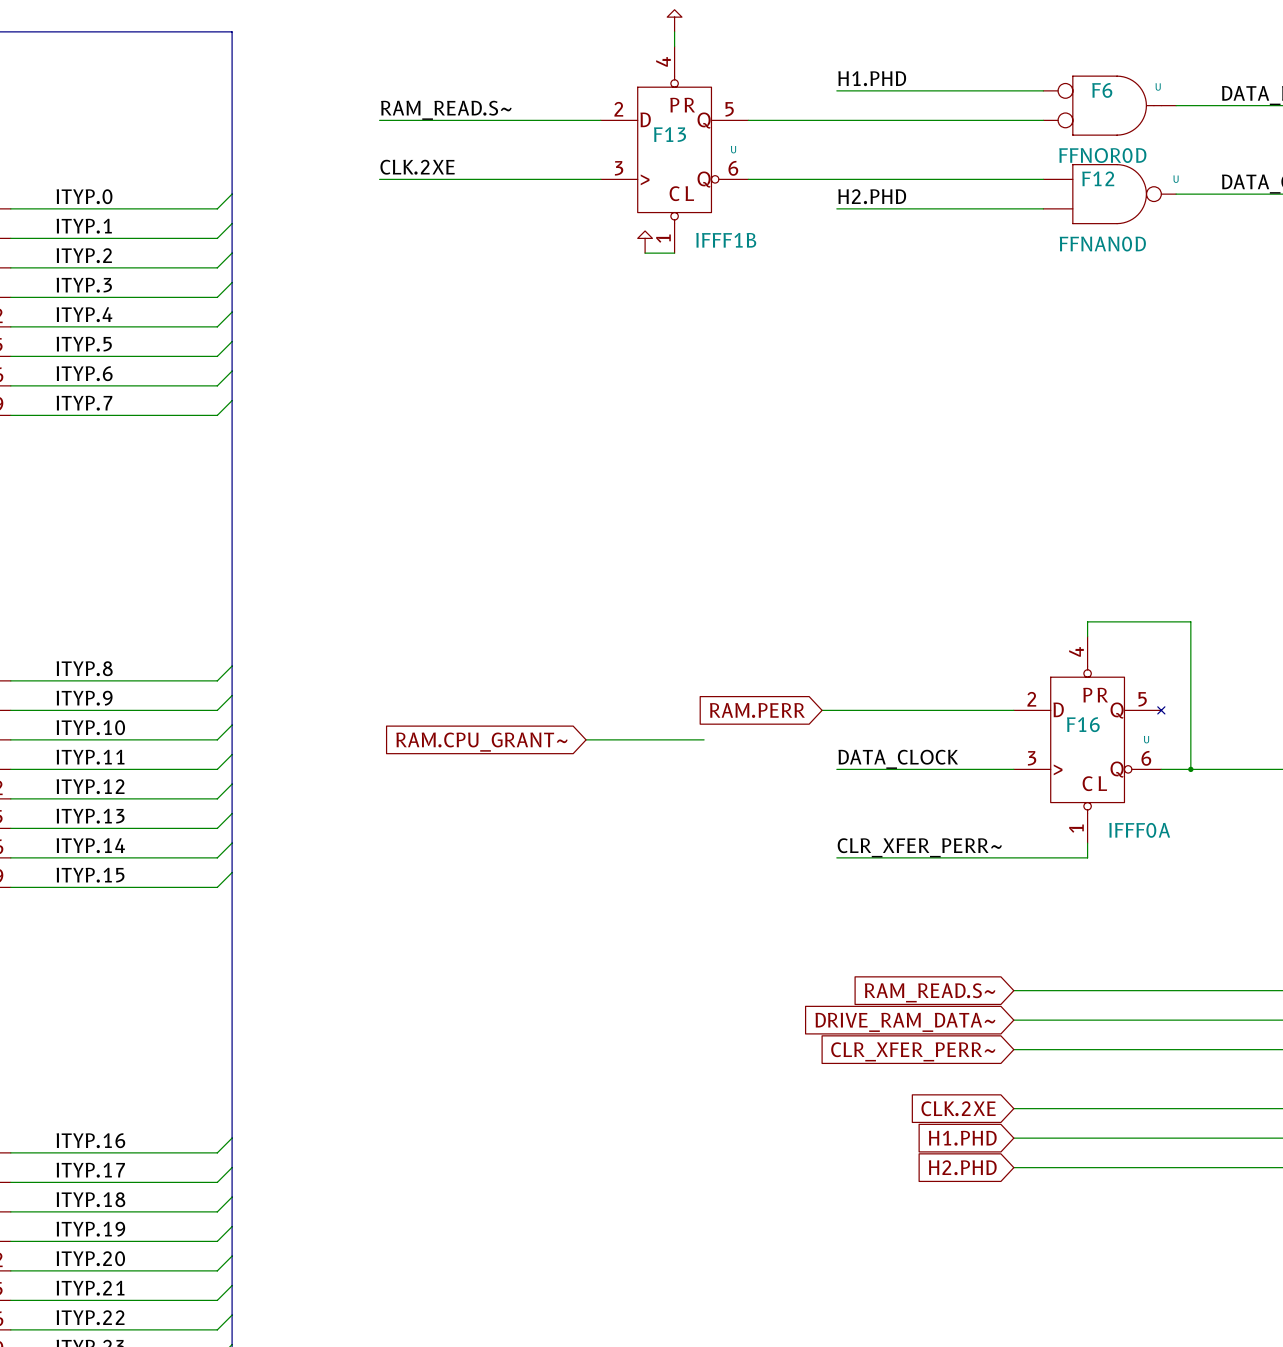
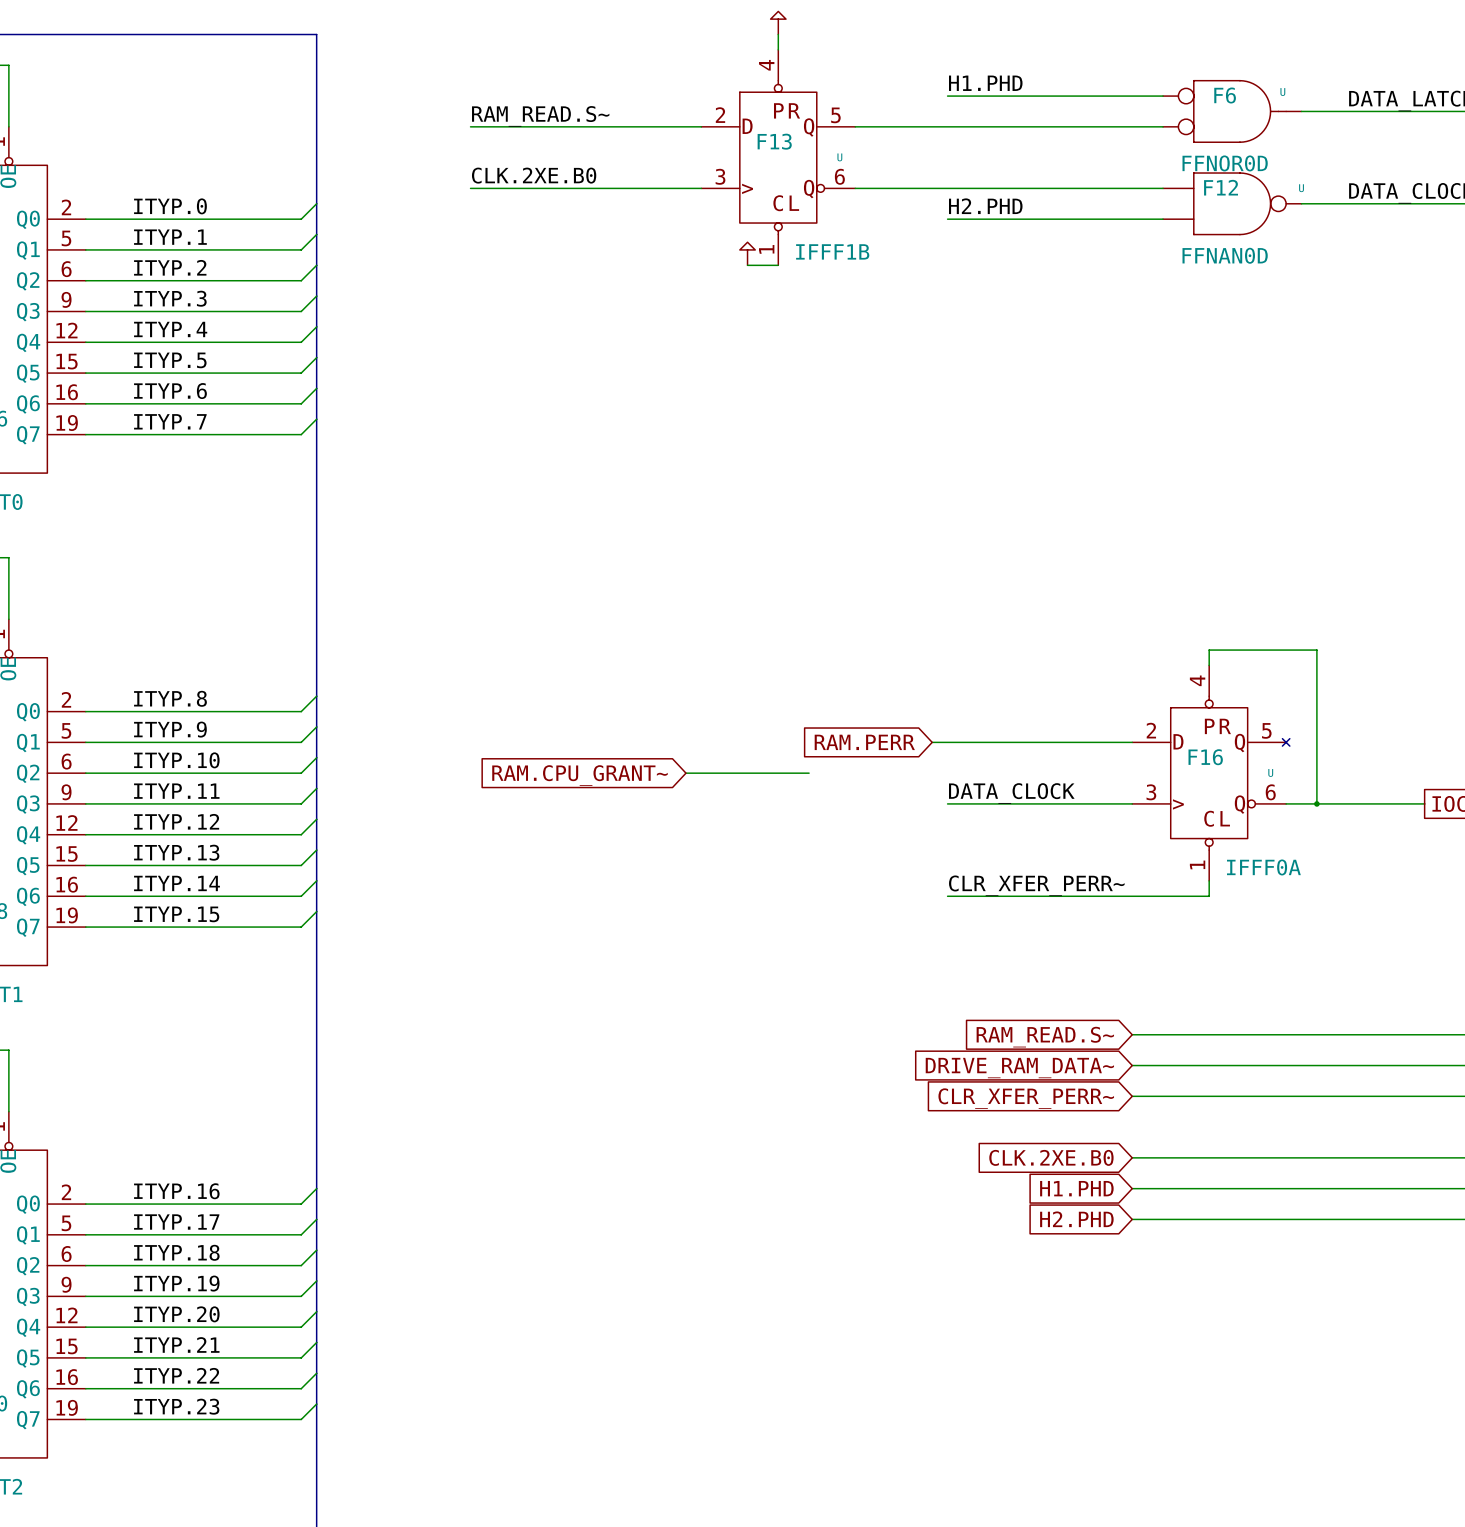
label: CLK.2XE (417, 167) -> CLK.2XE.B0 (534, 175)
global label: CLK.2XE (958, 1108) -> CLK.2XE.B0 (1051, 1157)

